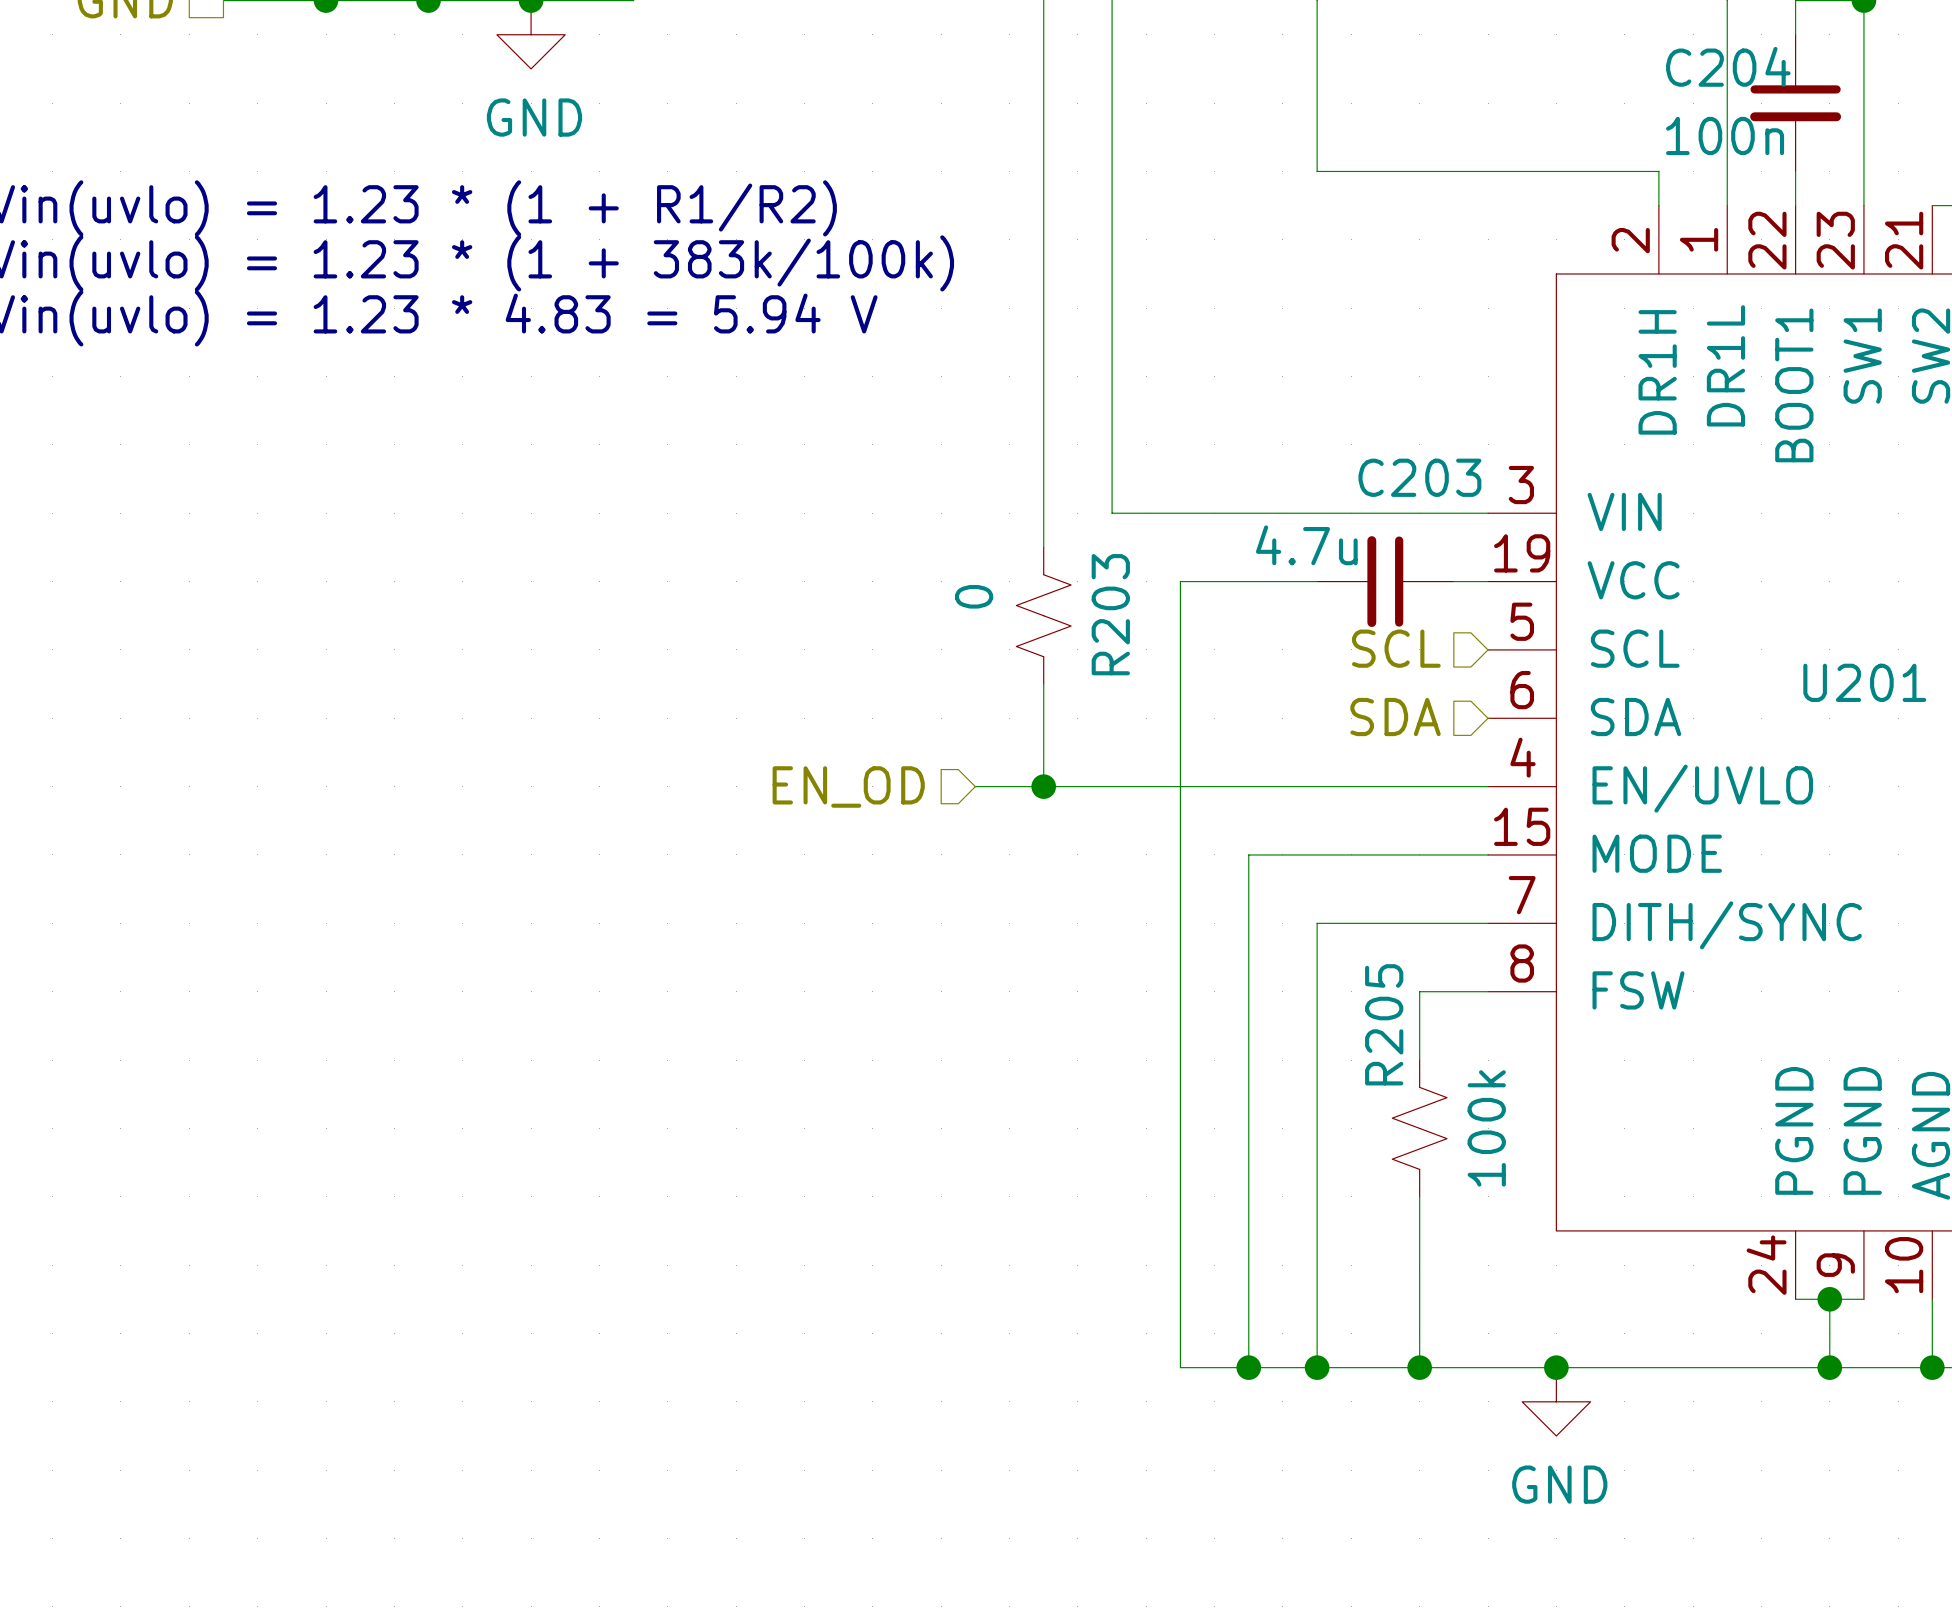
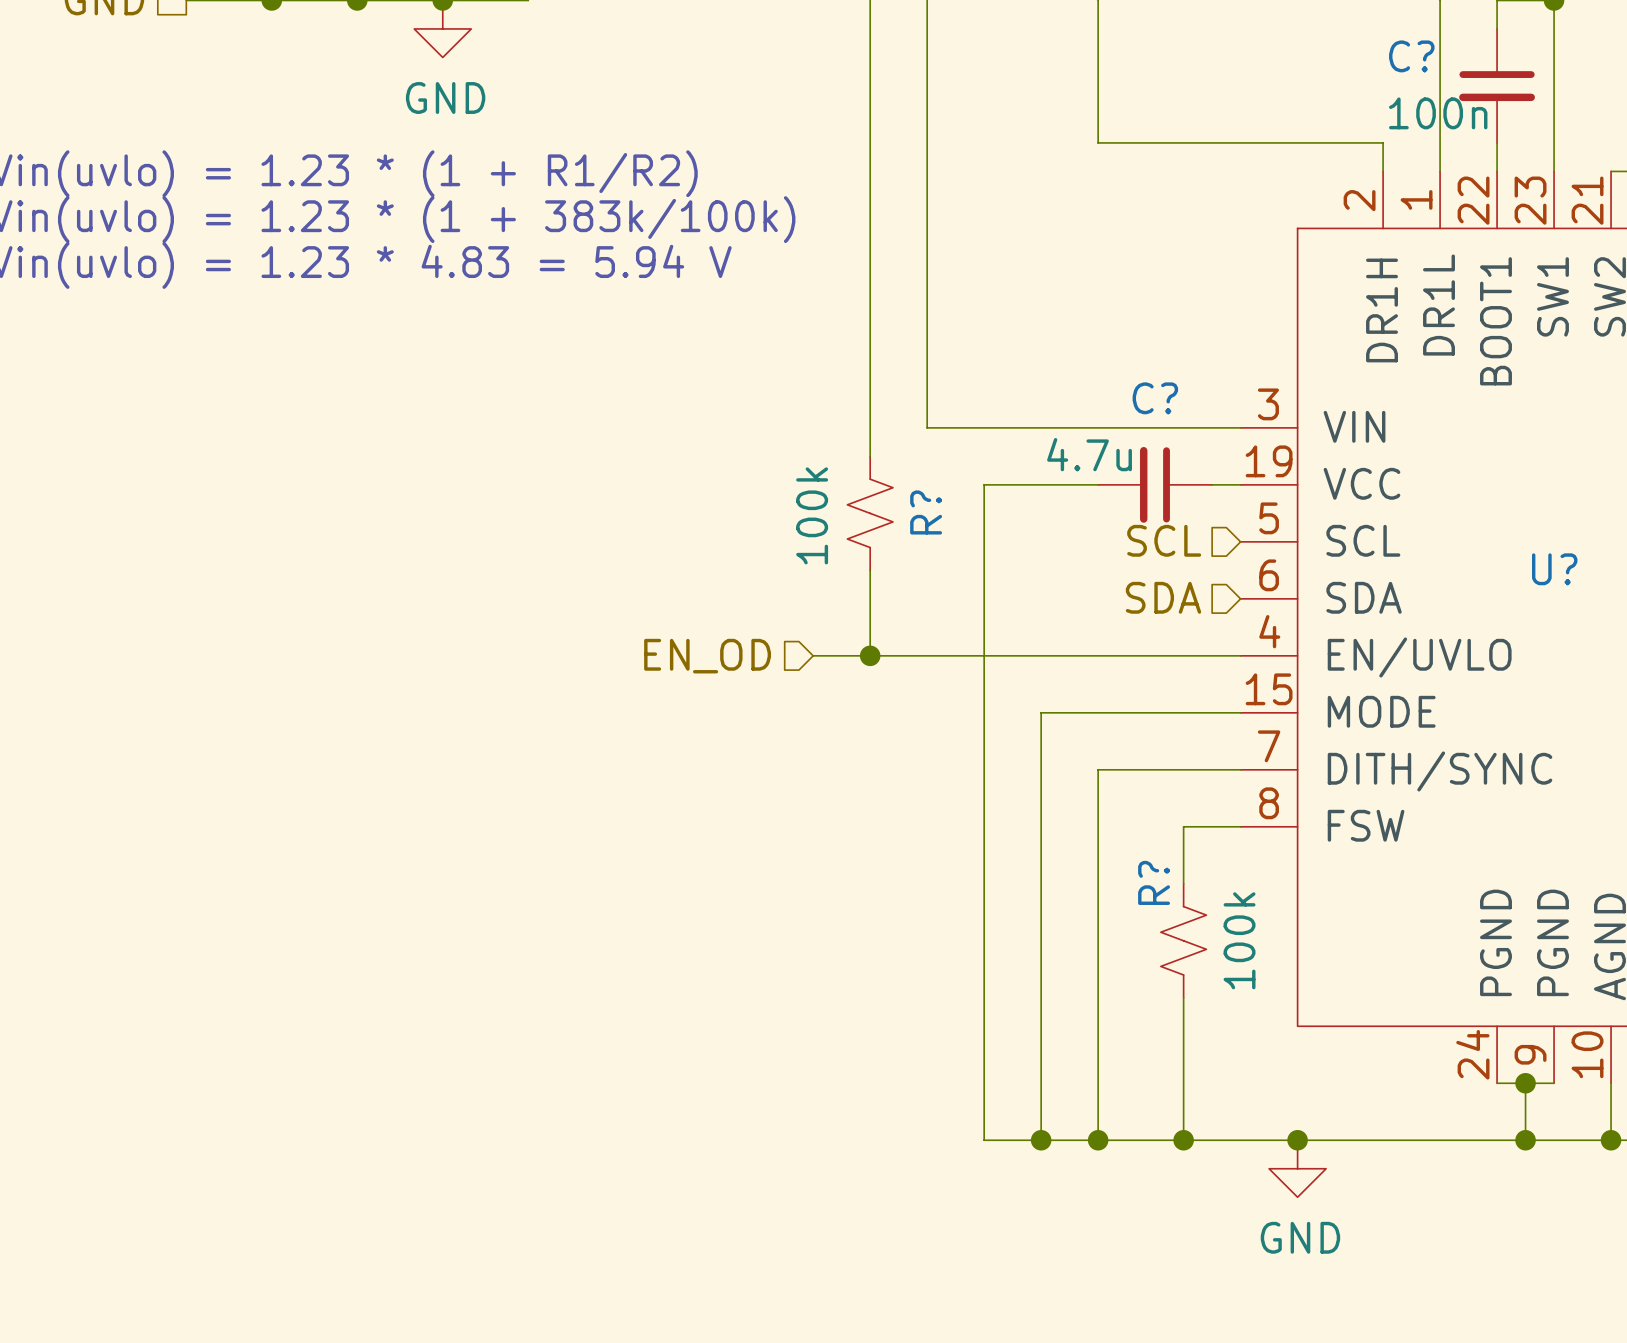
C204 name: C204 (1728, 66) -> C? (1411, 56)
C203 name: C203 (1419, 477) -> C? (1155, 398)
R203 value: 0 (974, 596) -> 100k (812, 515)
R203 name: R203 (1110, 614) -> R? (926, 512)
U201 name: U201 (1864, 682) -> U? (1554, 569)
R205 name: R205 (1384, 1024) -> R? (1154, 882)

